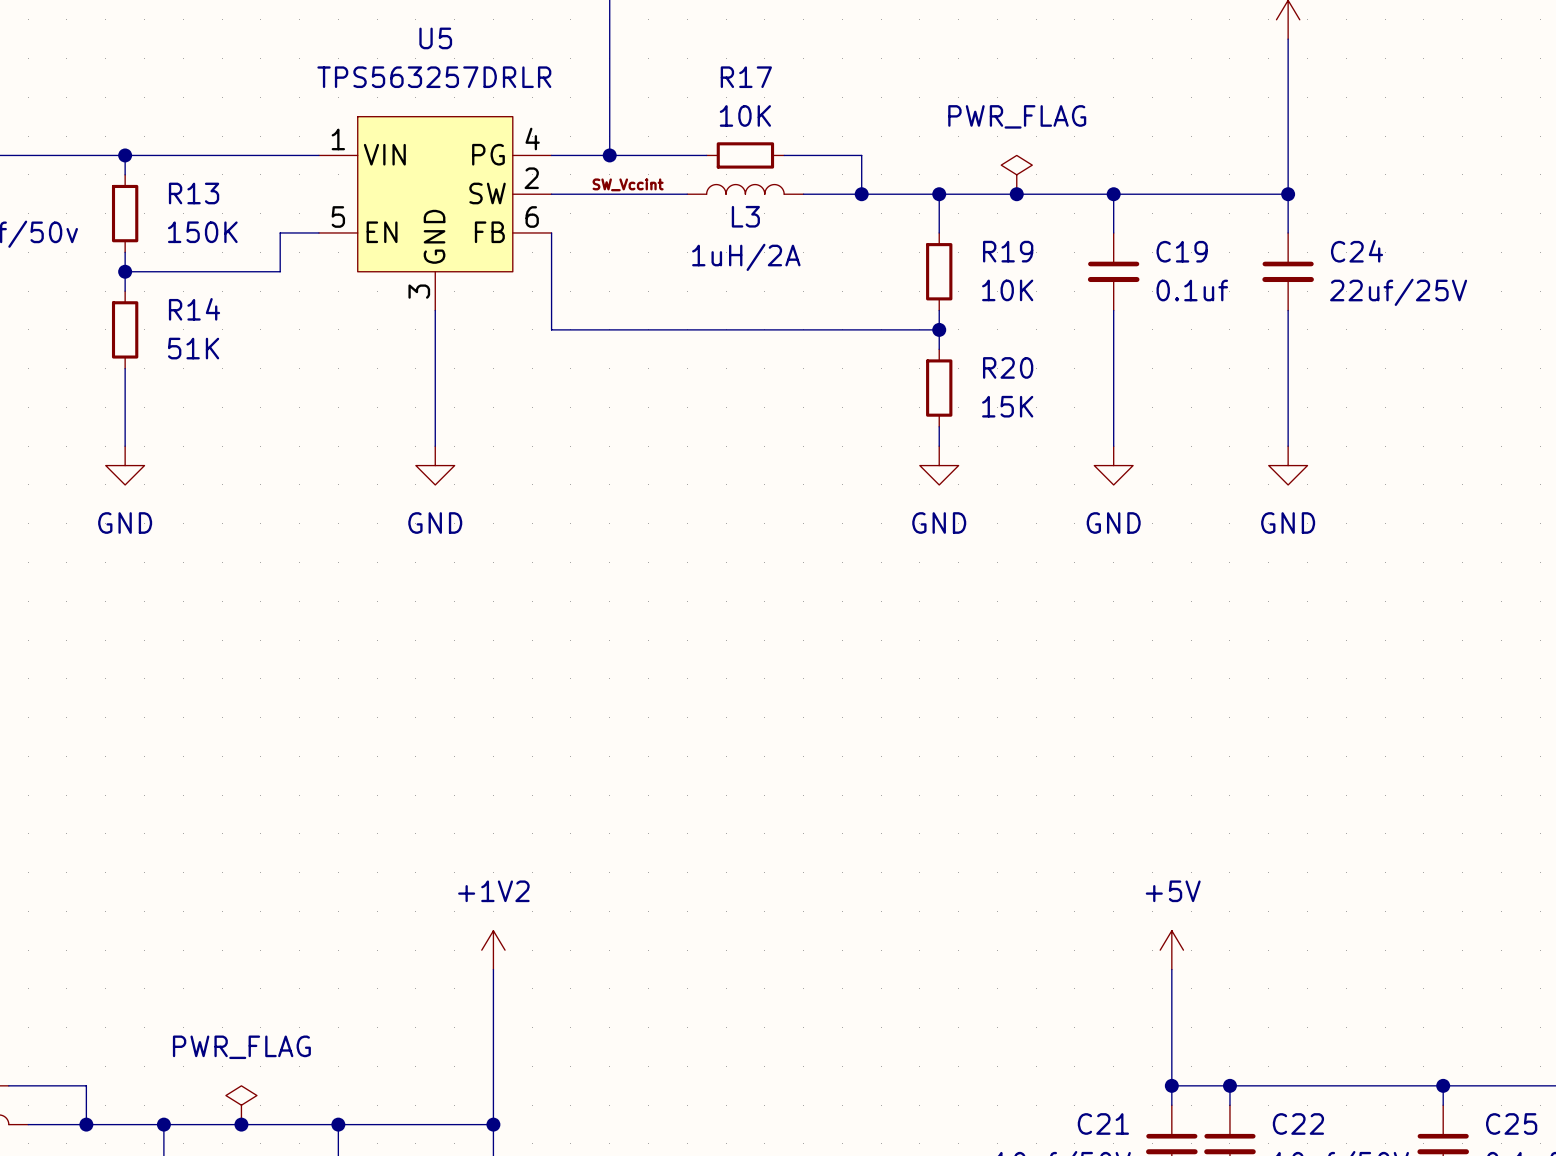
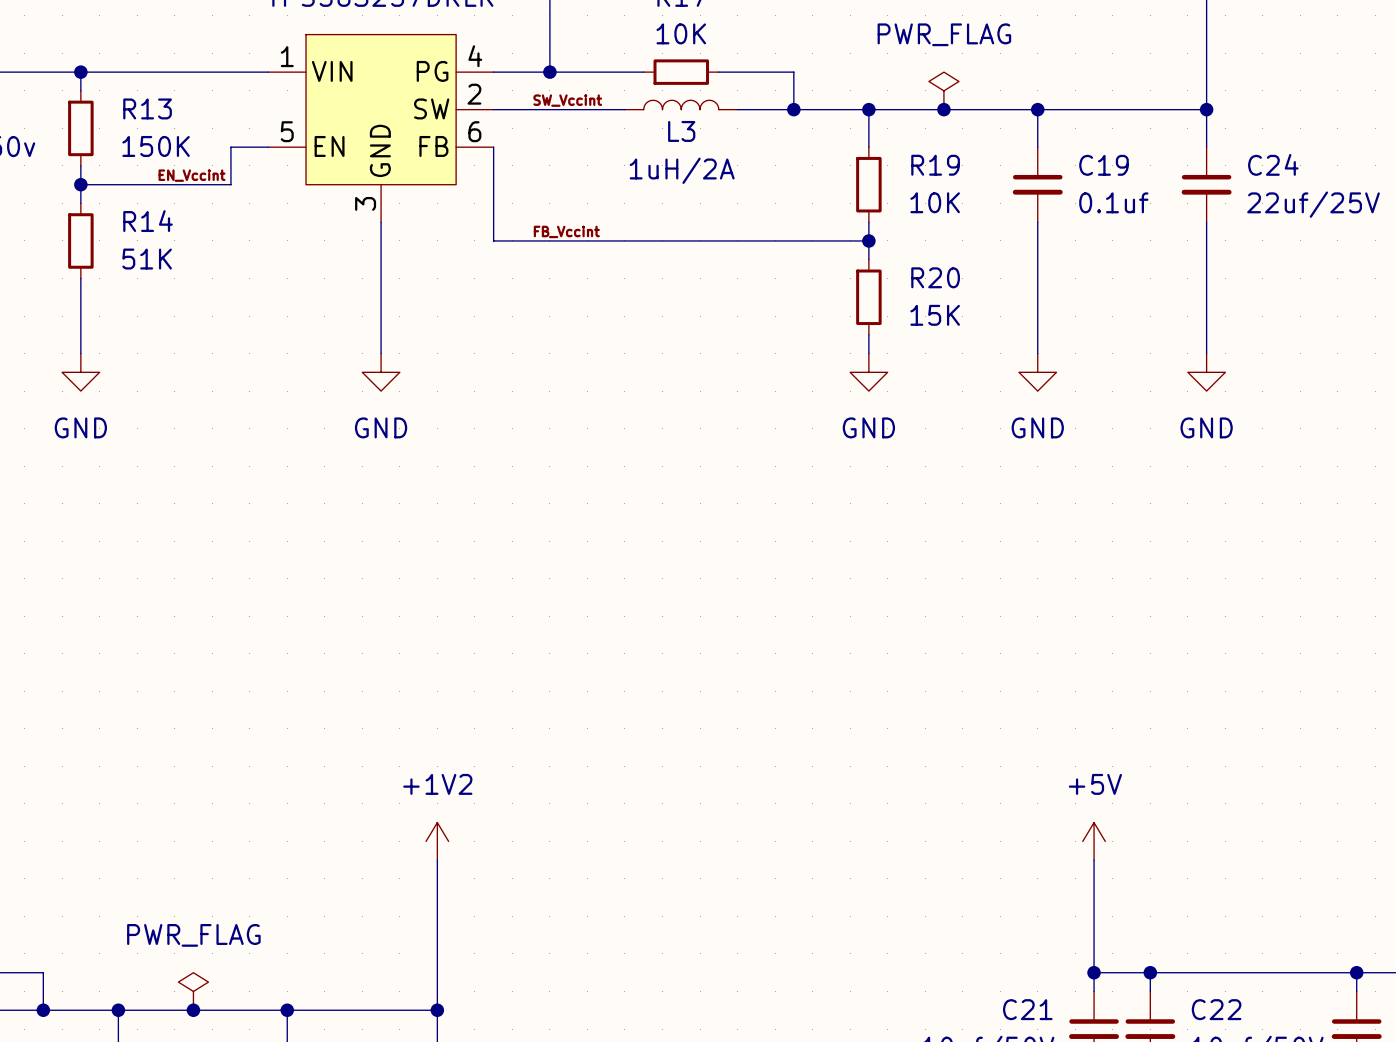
label: none -> EN_Vccint (192, 175)
label: none -> FB_Vccint (566, 231)

